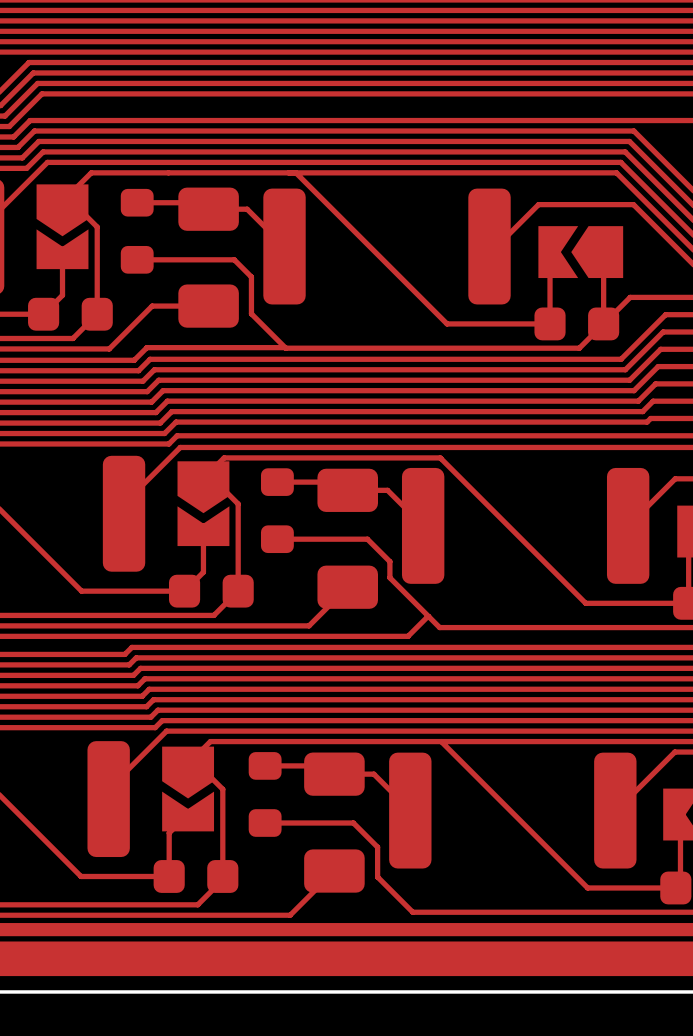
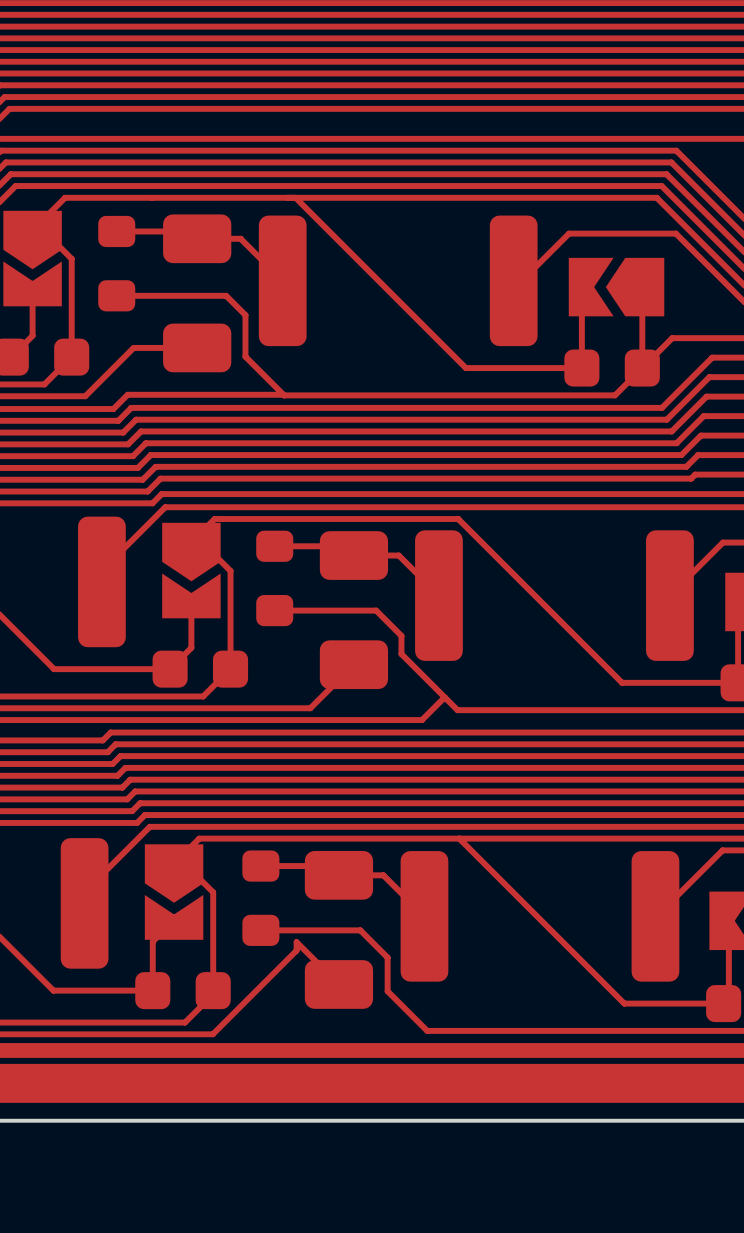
top track: (334, 871) (290, 915) (222, 915) -> (338, 984) (296, 942) (296, 950) (212, 1034)

